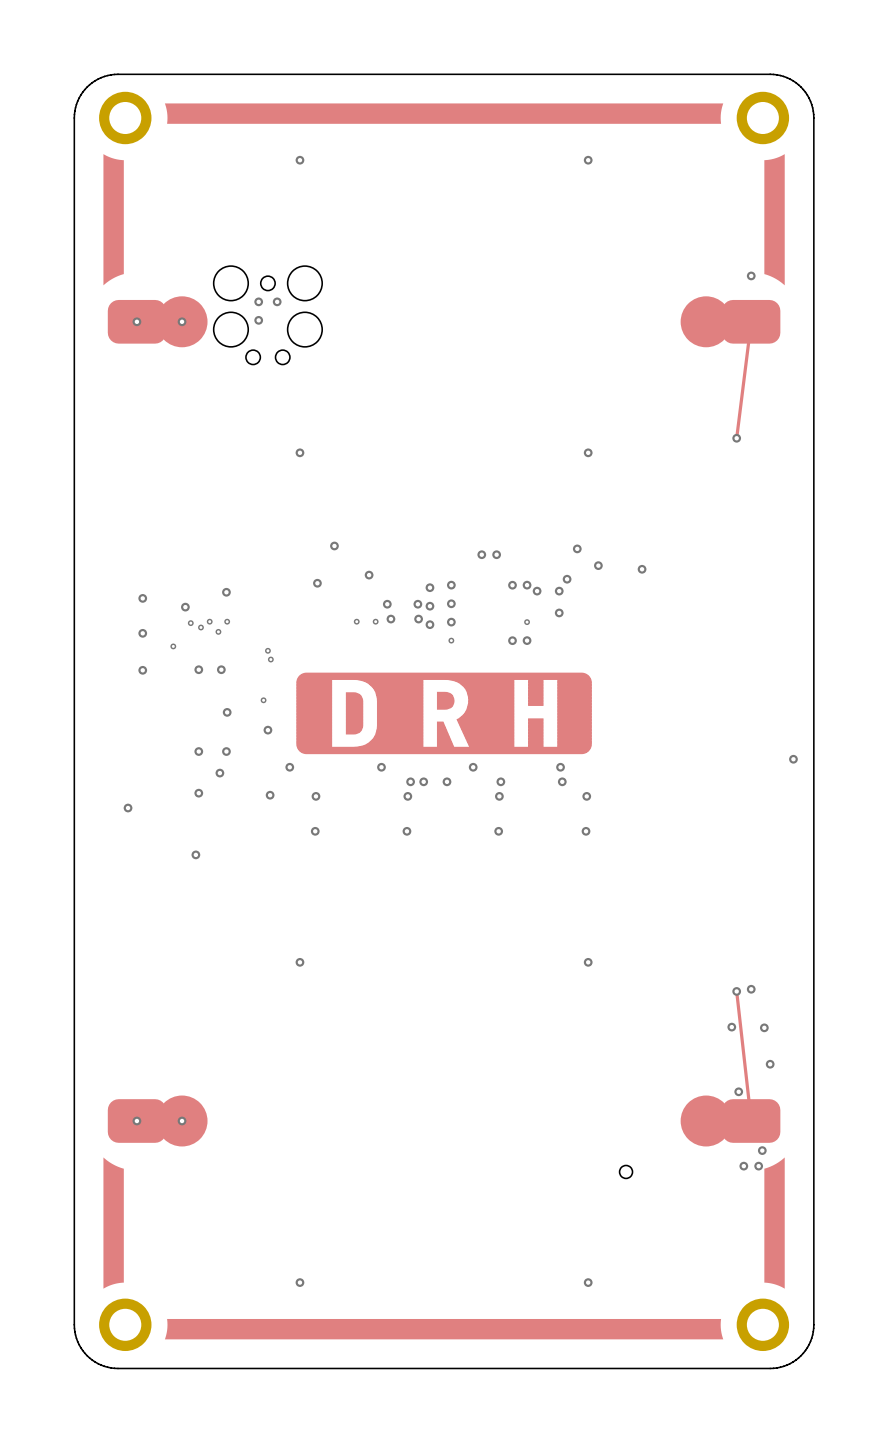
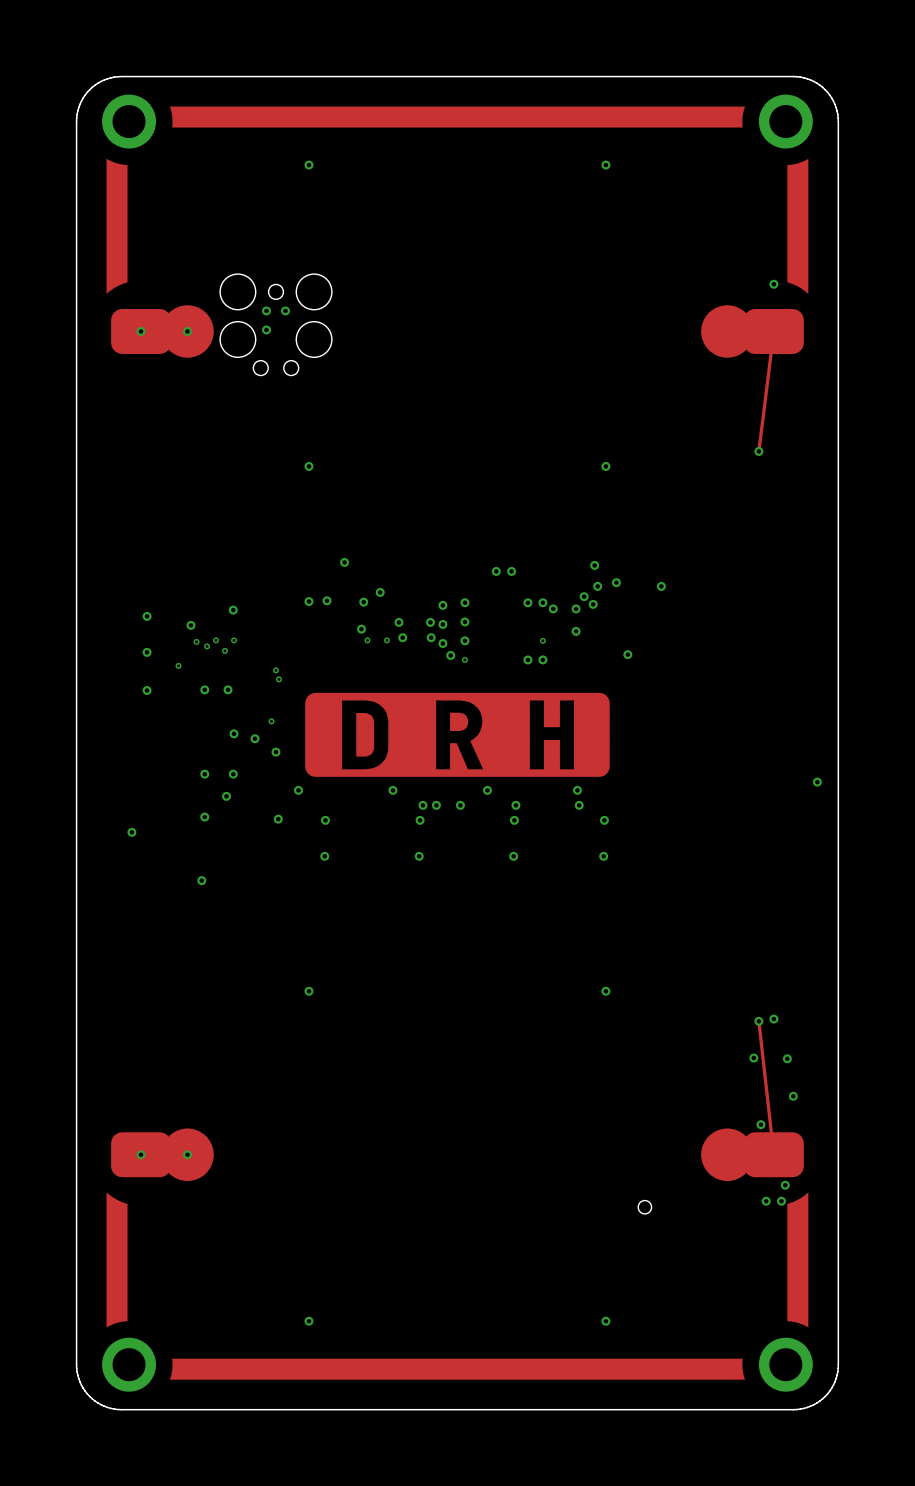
via: none -> (597, 586)
via: none -> (308, 601)
via: none -> (363, 602)
via: none -> (593, 604)
via: none -> (361, 629)
via: none -> (627, 654)
via: none -> (450, 655)
via: none -> (255, 738)

